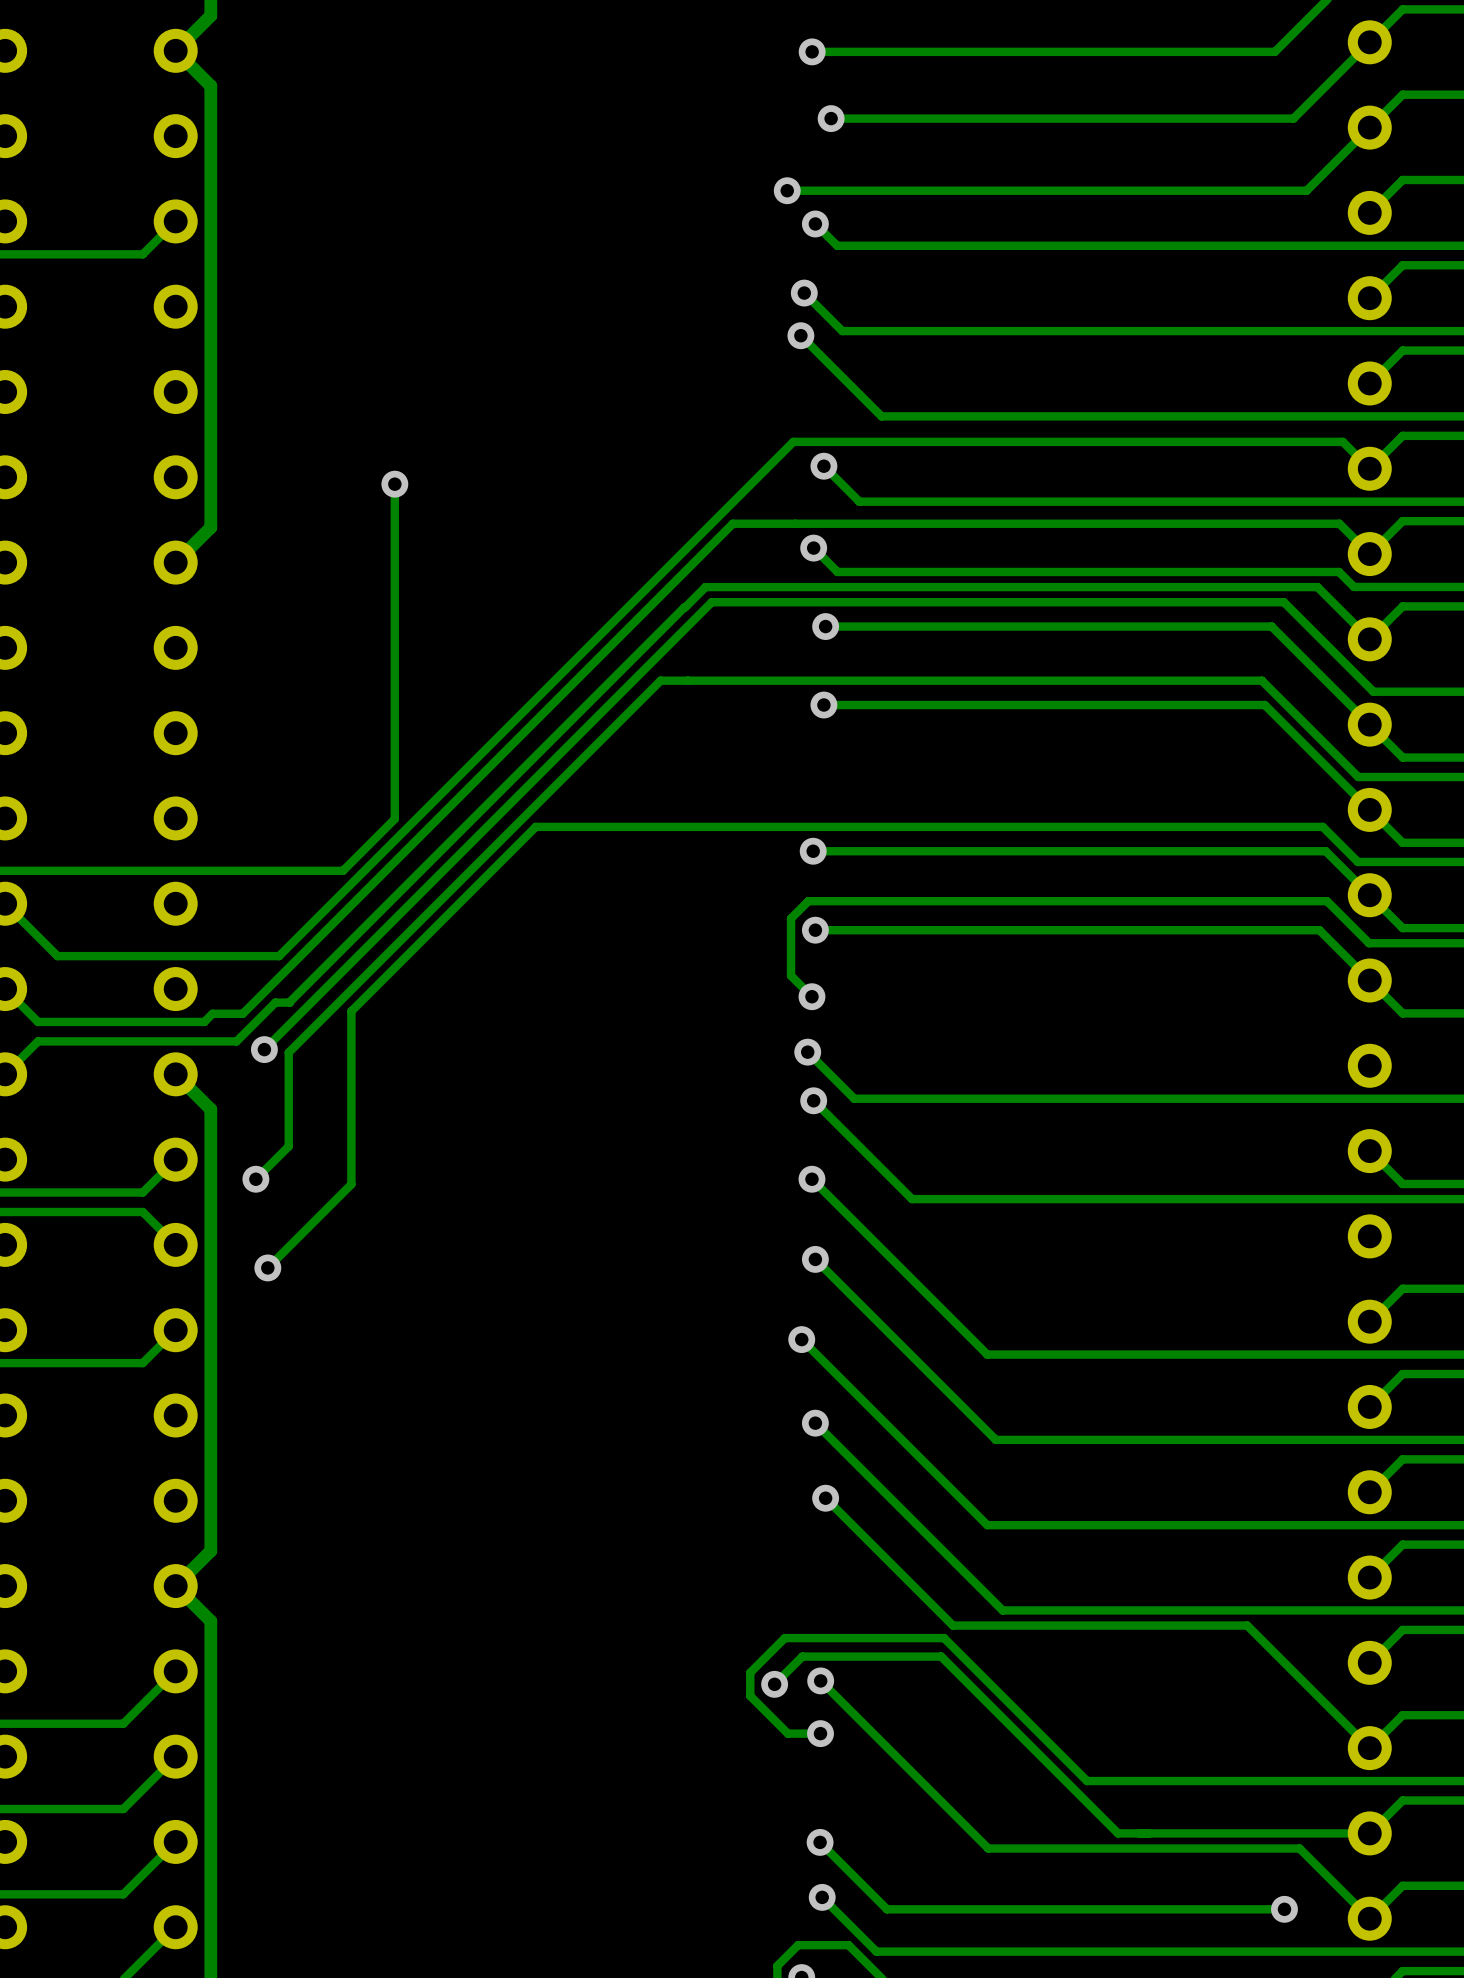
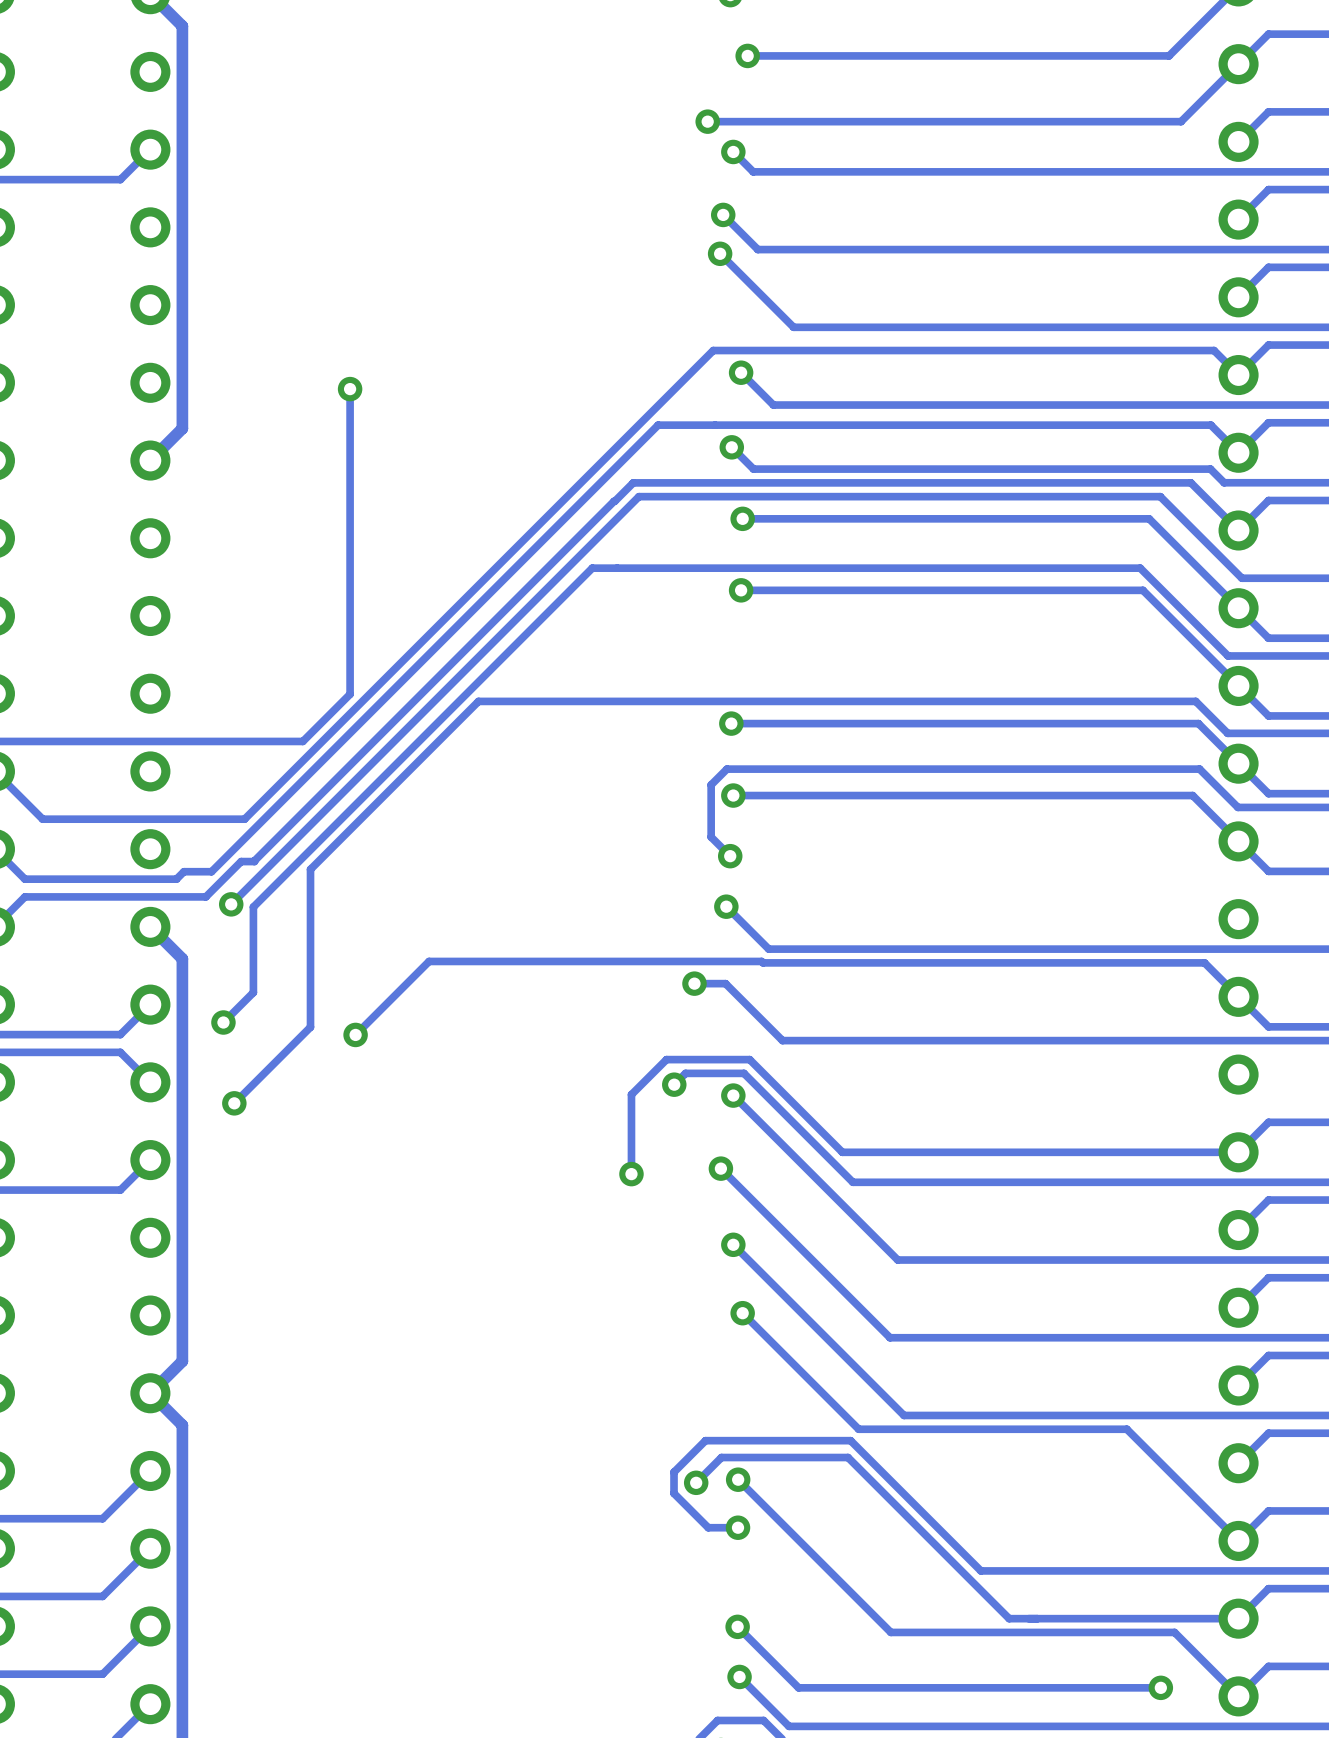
track: (813, 1100) (912, 1199) -> (694, 983) (725, 983) (782, 1040) (821, 1040)
via: (813, 1100) -> none
via: none -> (694, 983)
track: none -> (1238, 996) (1204, 962) (429, 961) (355, 1034)
track: (811, 1179) (987, 1354) -> (674, 1084) (685, 1073) (743, 1073) (852, 1182) (890, 1182)
via: (811, 1179) -> none
via: none -> (355, 1034)
via: none -> (674, 1084)
track: none -> (1238, 1152) (842, 1152) (749, 1059) (666, 1059) (631, 1094) (631, 1174)
via: none -> (631, 1174)

